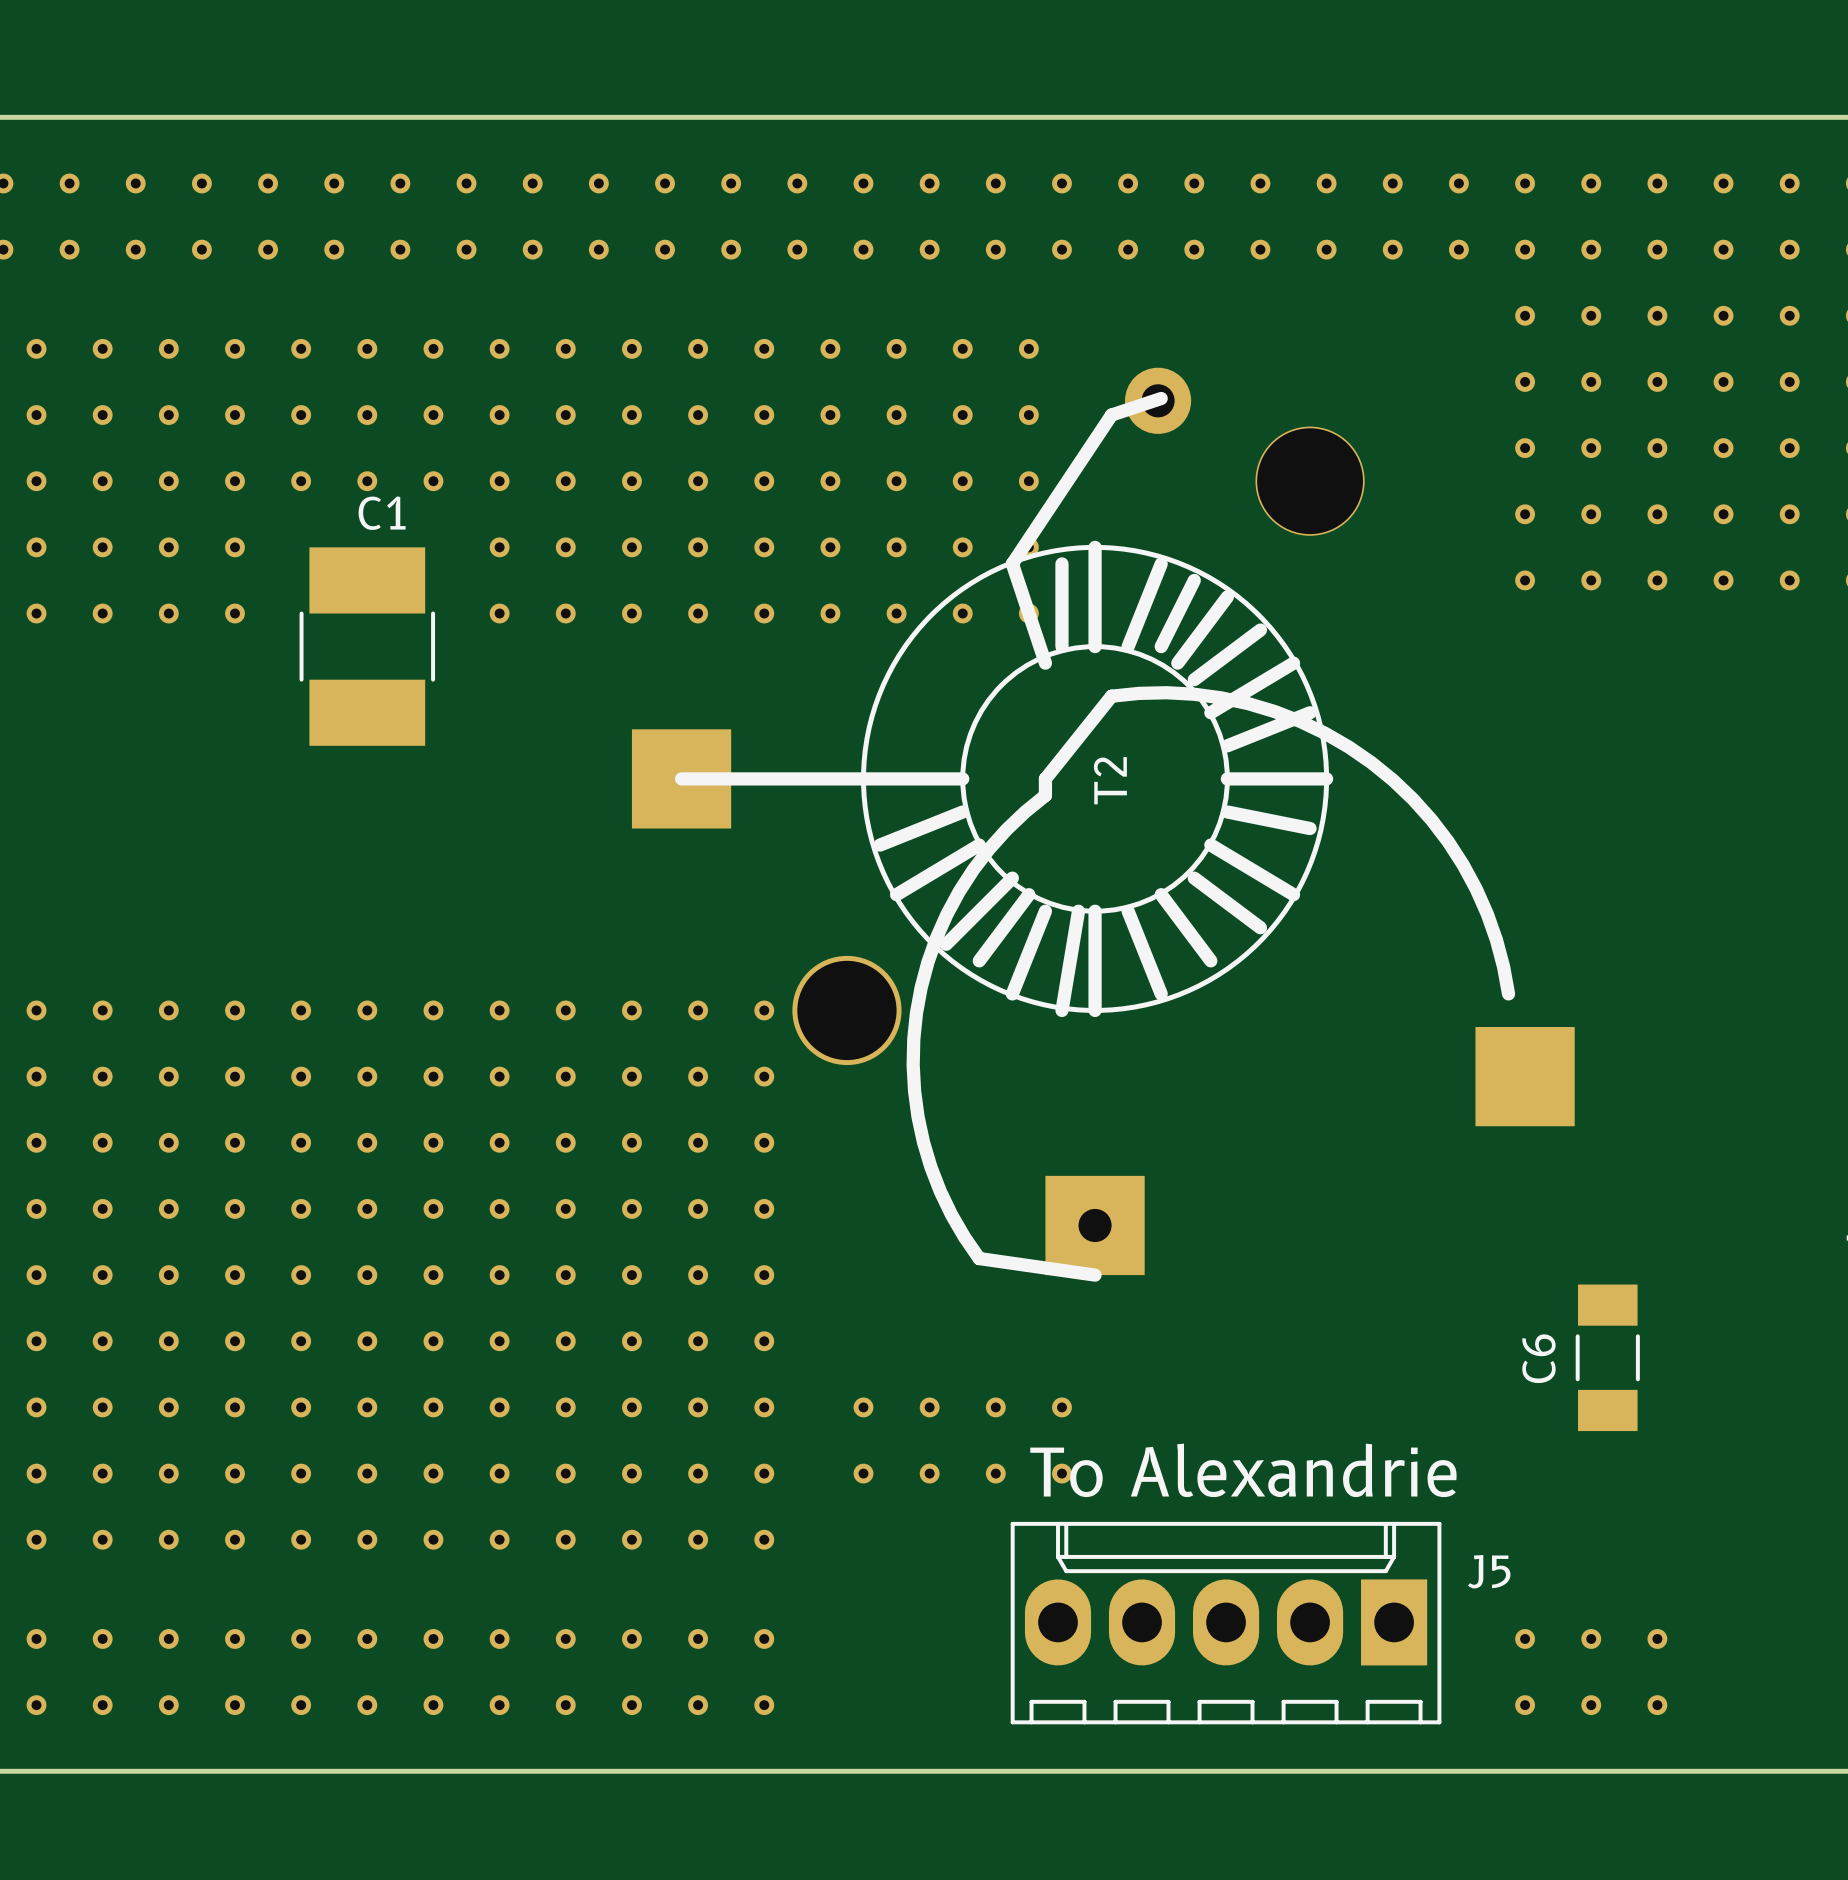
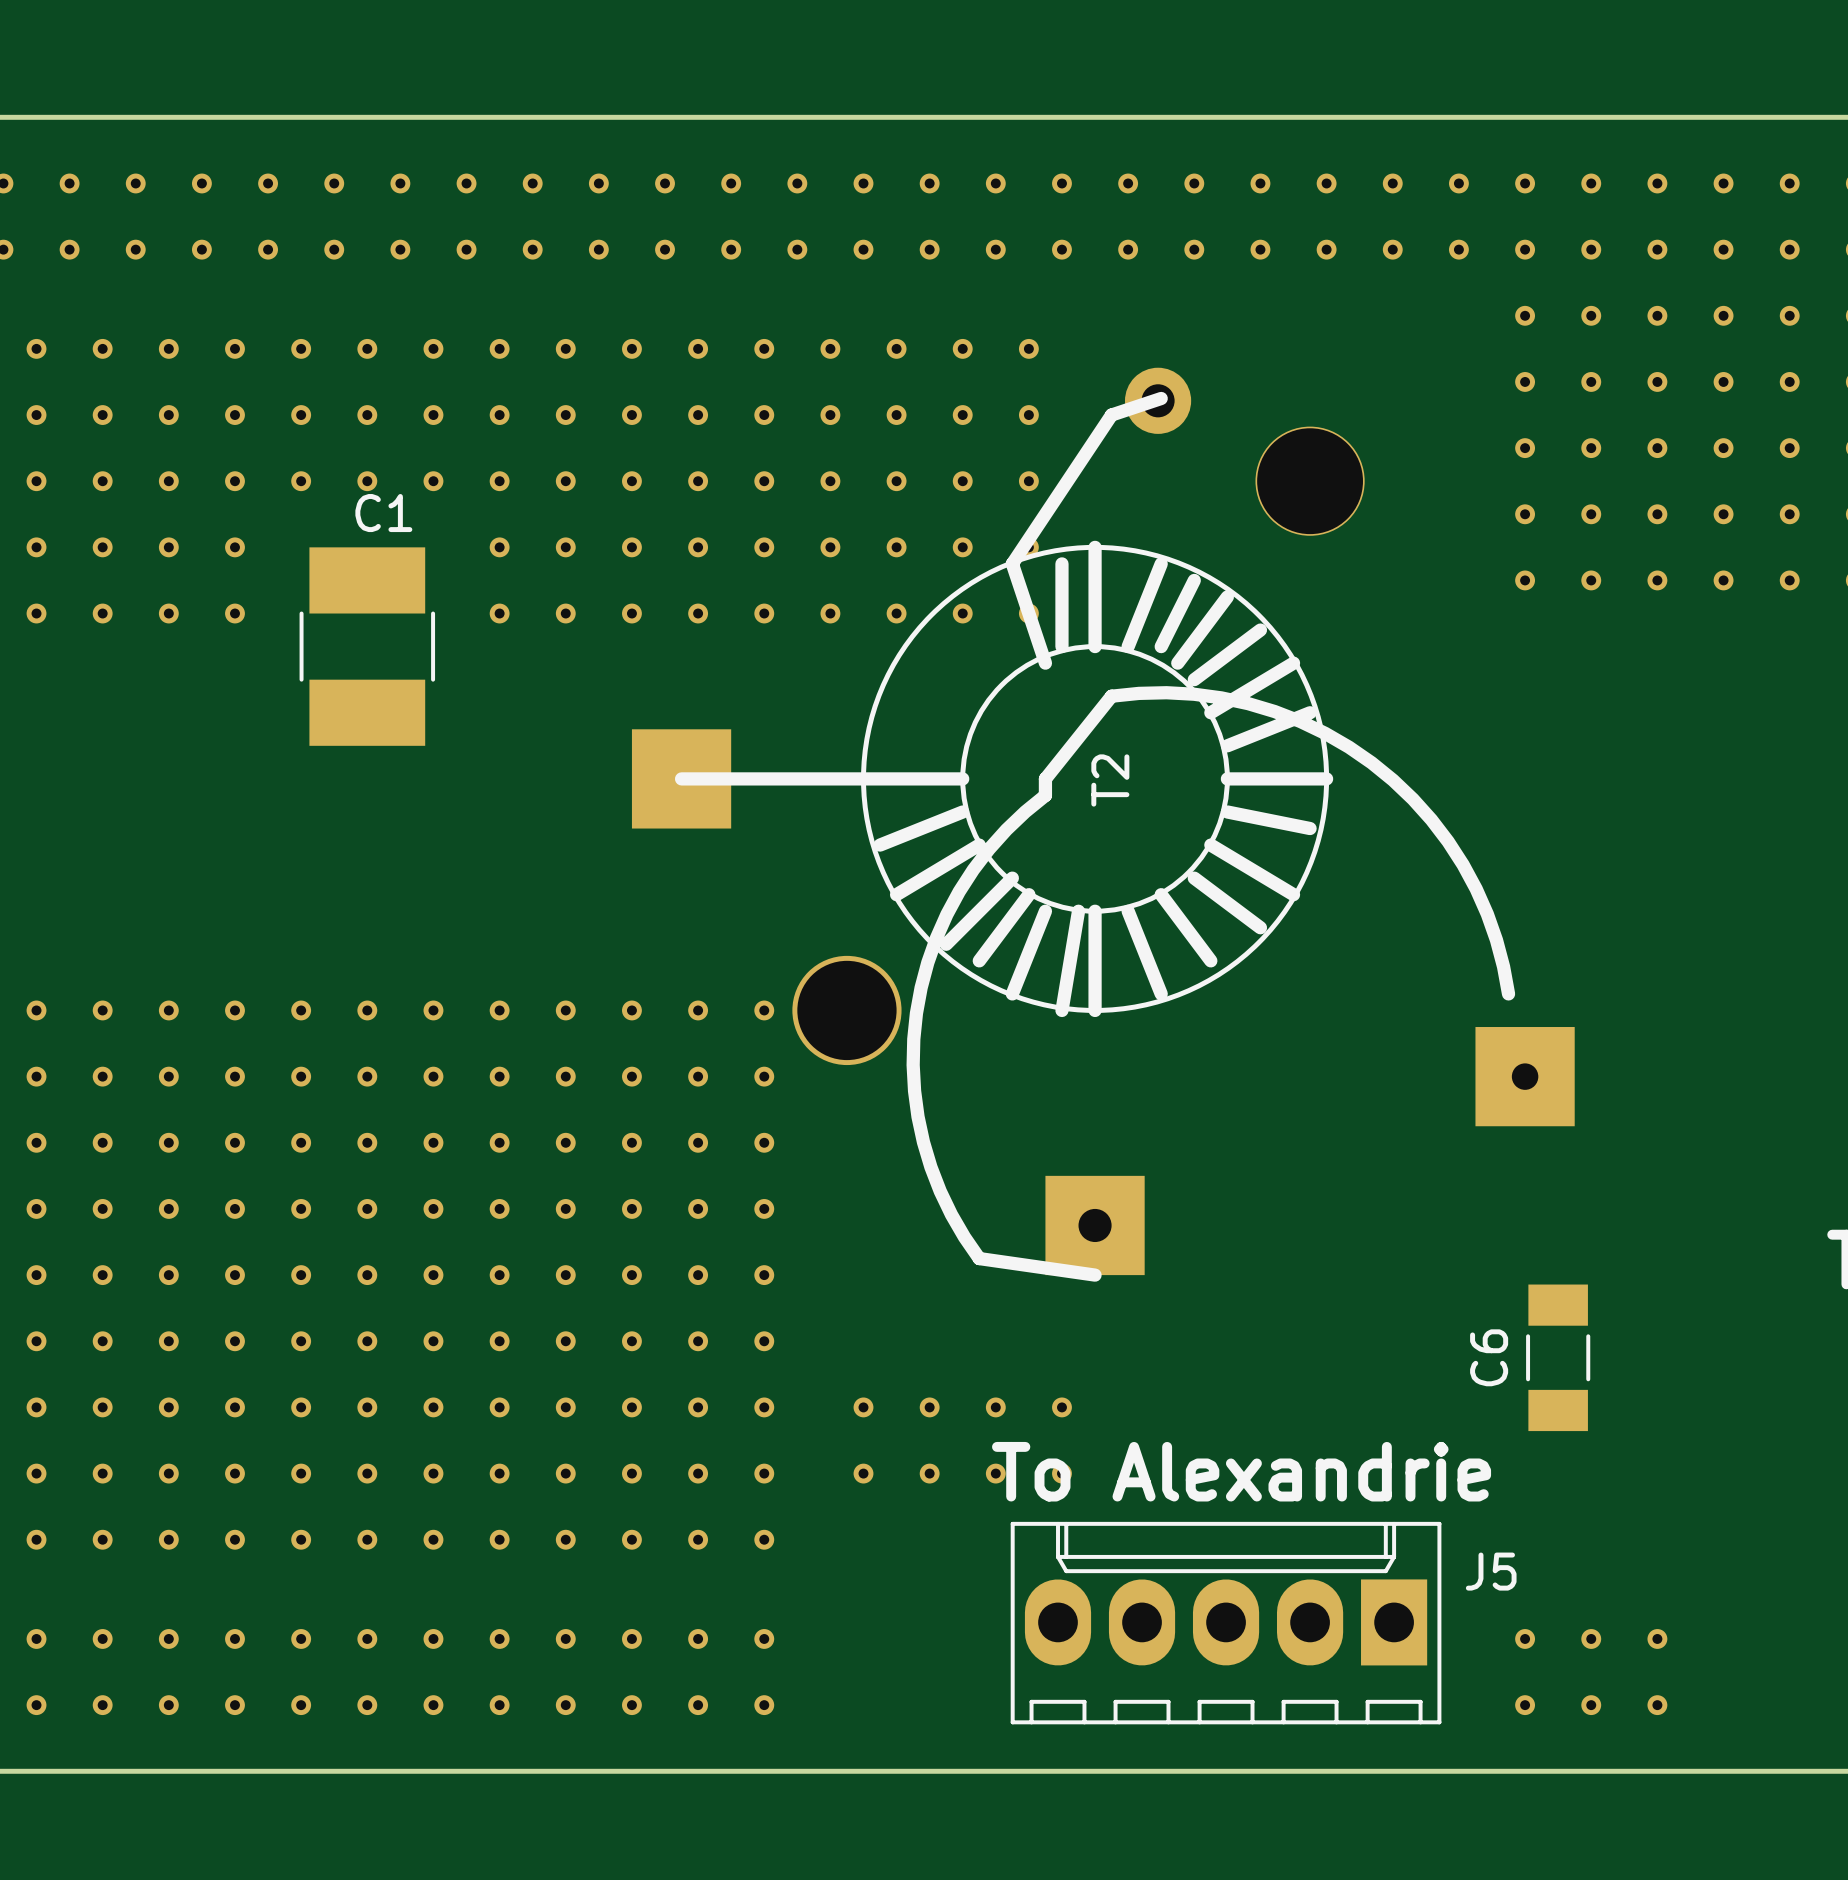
T2 footprint: [631, 367, 1575, 1282] -> [631, 367, 1575, 1282]
C6 position: (1607, 1357) -> (1558, 1357)

